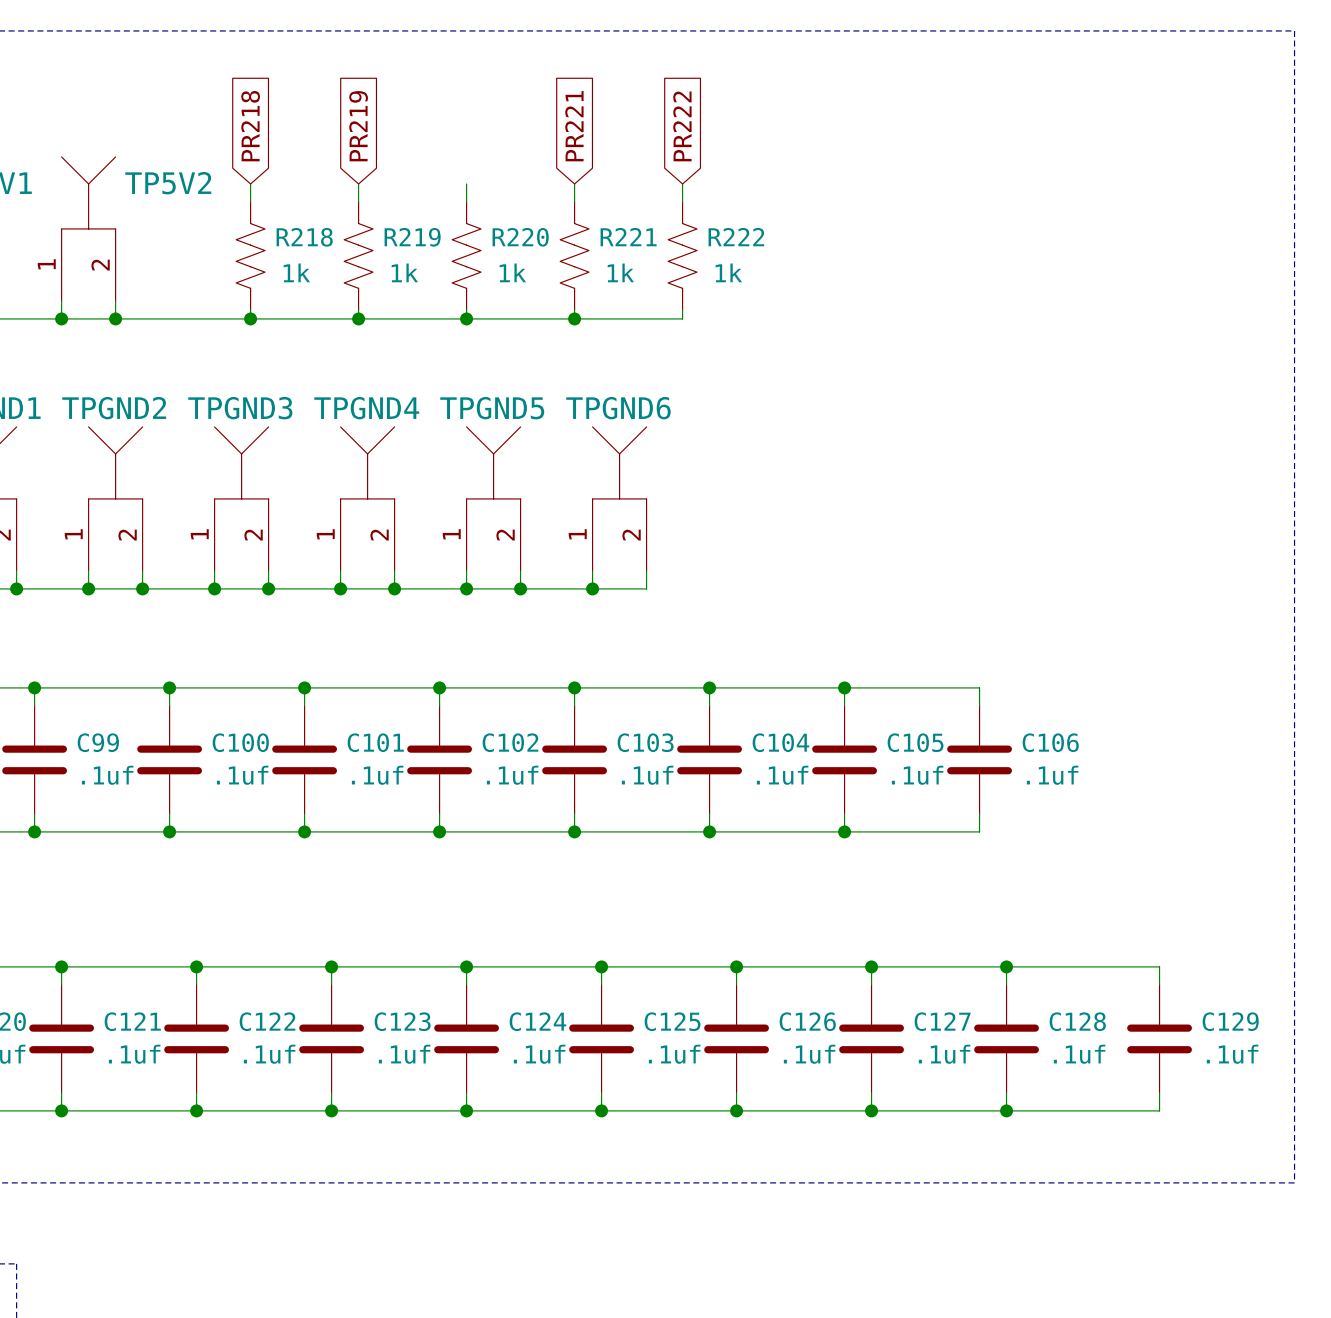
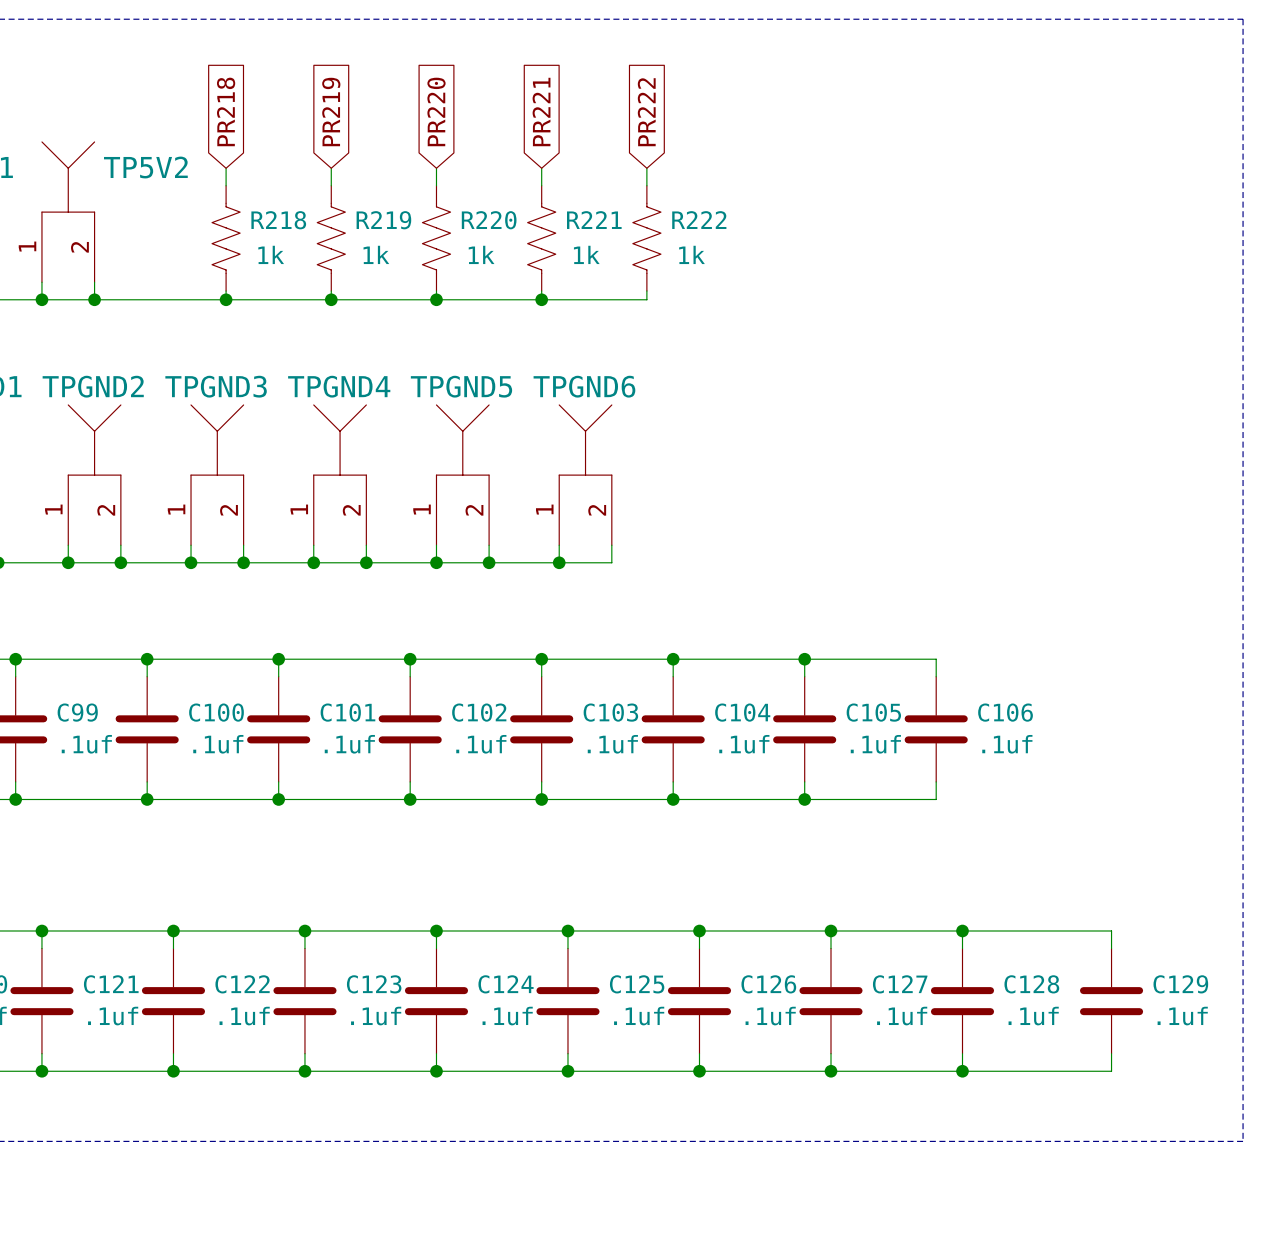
global label: none -> PR220 (436, 111)

